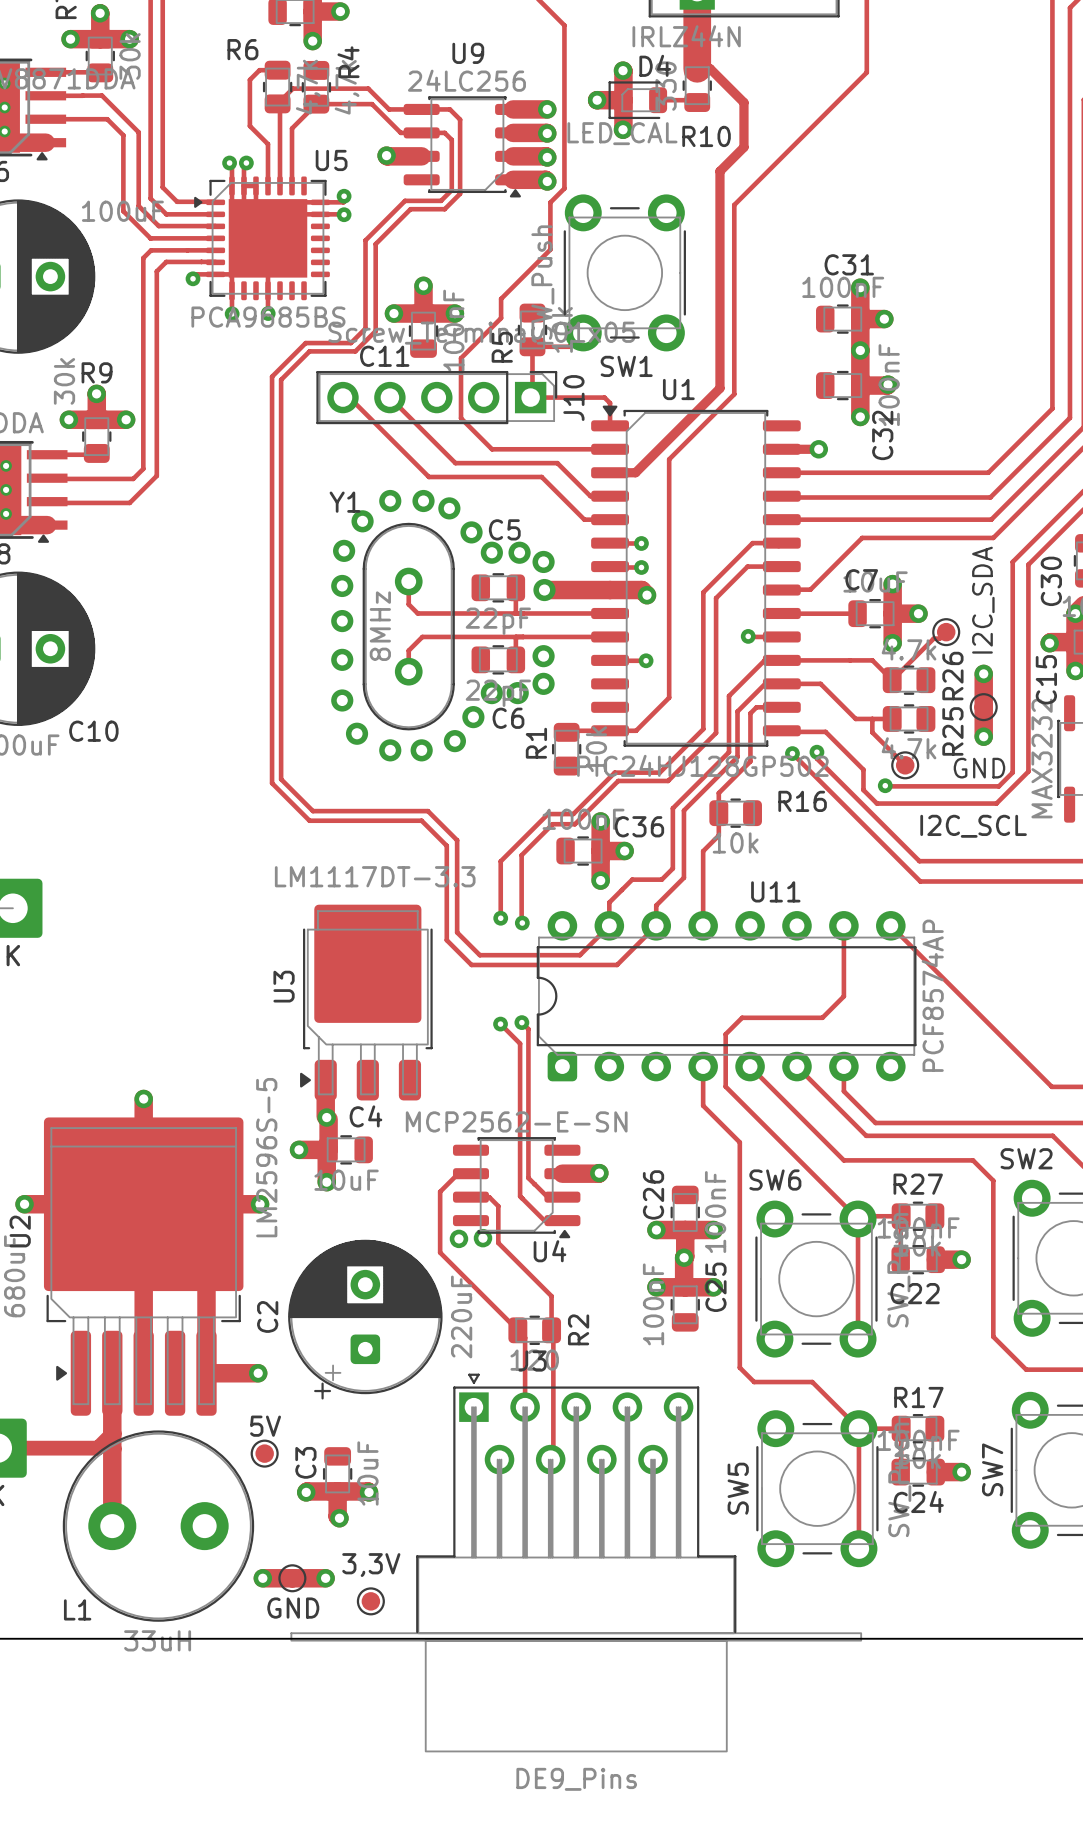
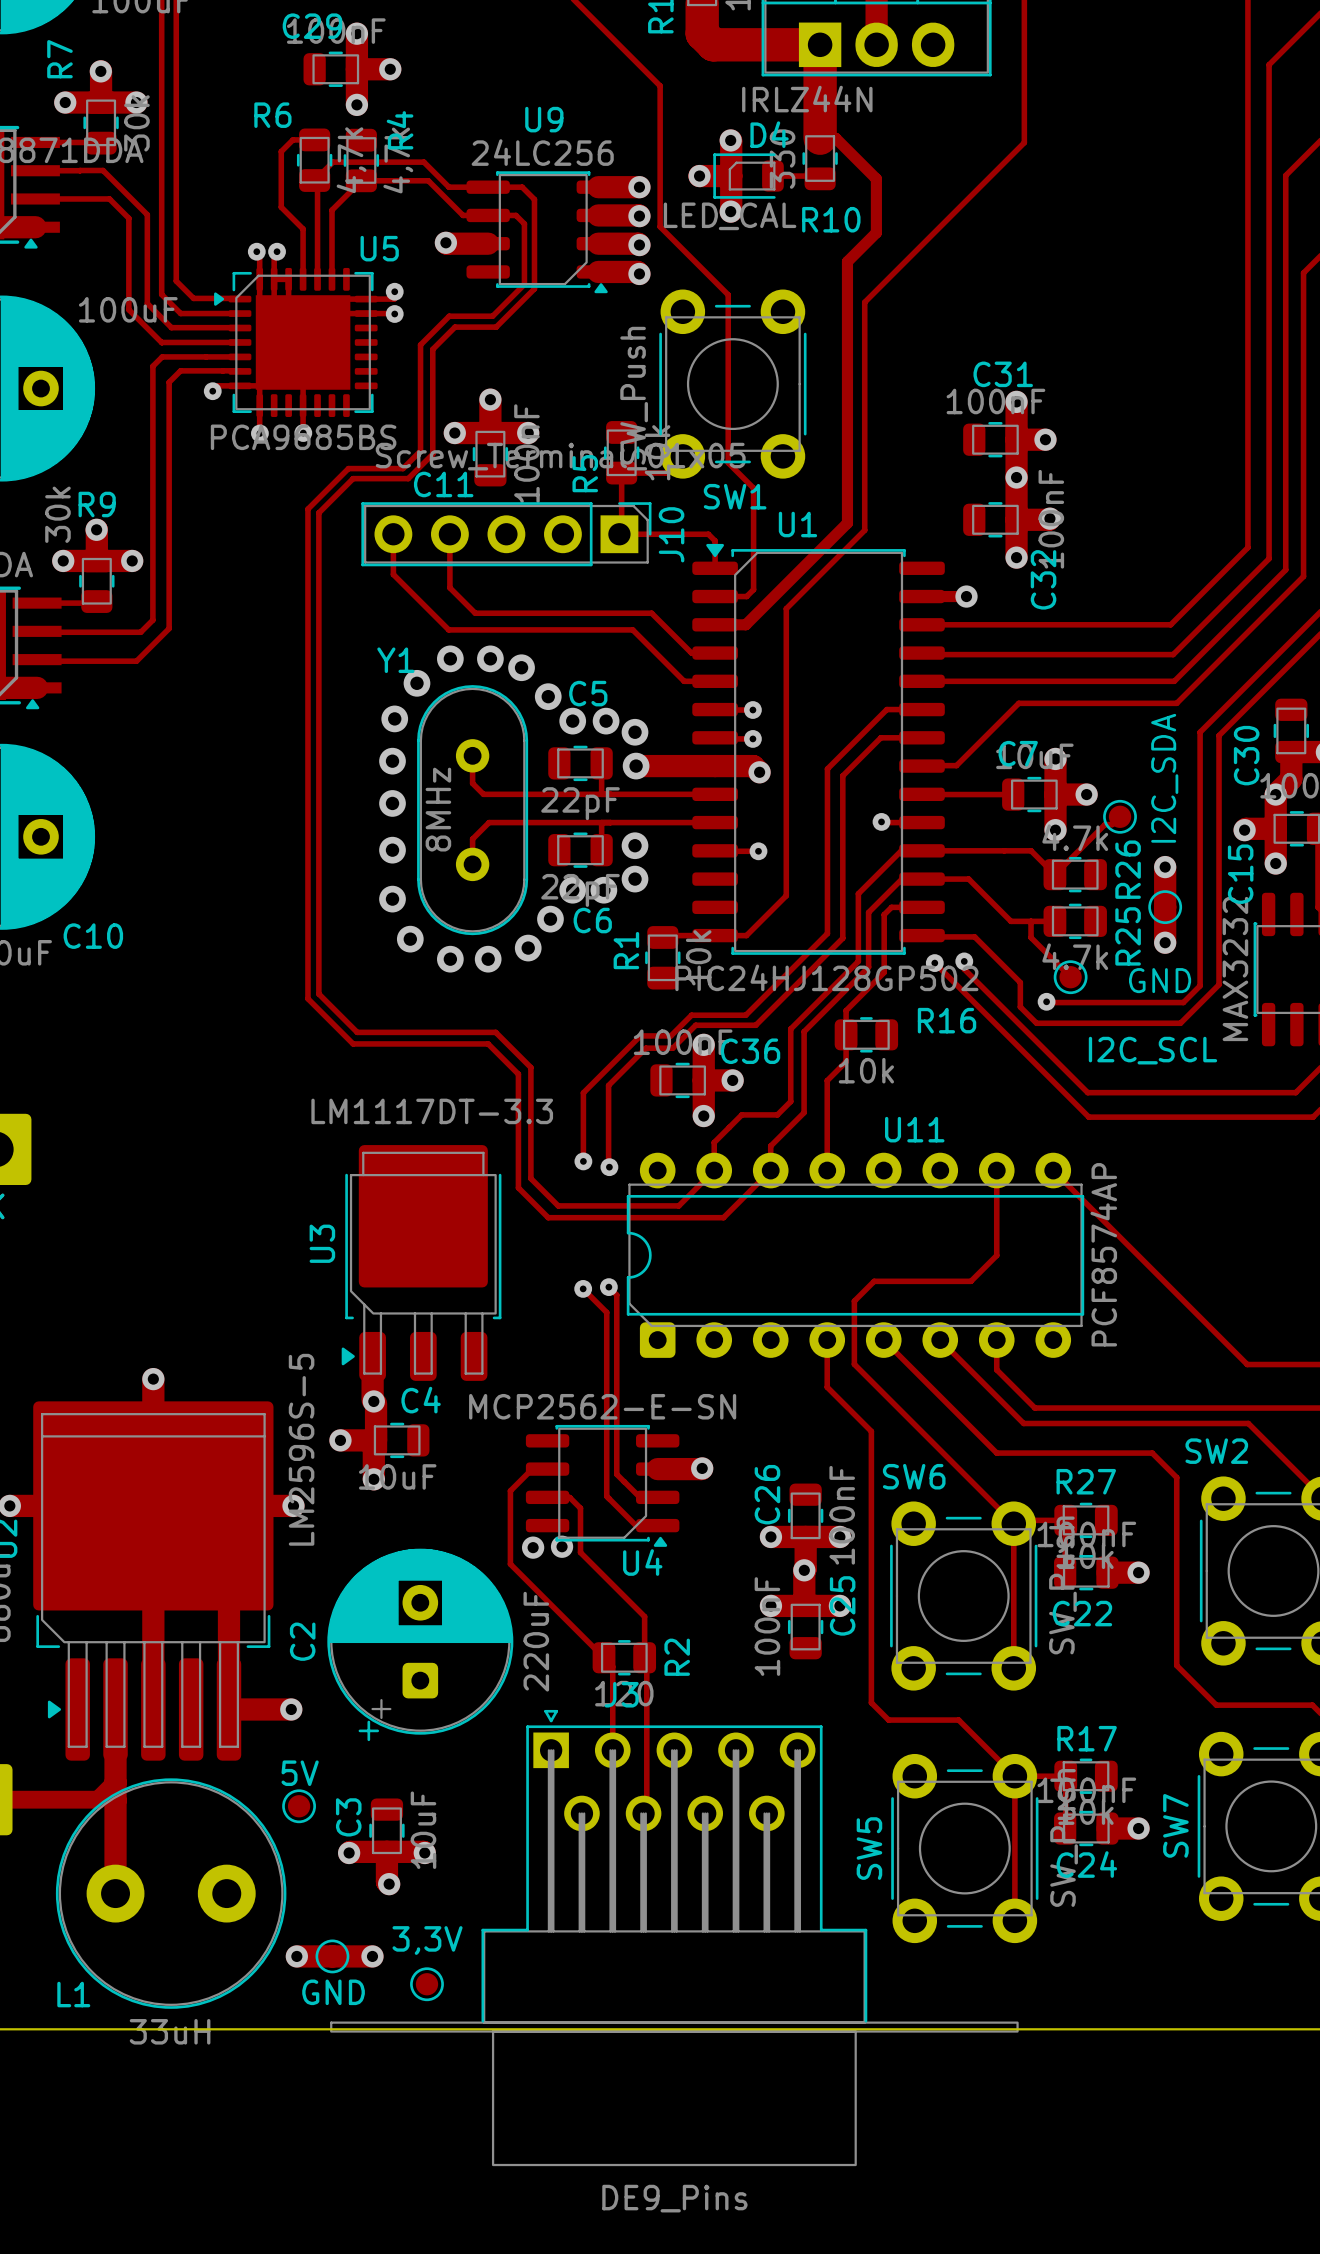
track: (564, 142) (564, 188) (550, 202) (550, 249) (501, 298) (501, 318) (461, 358) (461, 418) (492, 449) (610, 449) -> (660, 226) (728, 294) (728, 462) (753, 488) (753, 589) (746, 596) (715, 596)
track: (441, 200) (405, 200) (389, 216) -> (511, 297) (492, 316) (449, 316)
track: (444, 209) (410, 209) (394, 225) -> (515, 307) (496, 327) (455, 327)
track: (342, 397) (349, 397) (428, 476) -> (393, 534) (393, 574) (448, 629) (496, 629)
track: (389, 397) (455, 463) -> (449, 534) (449, 587) (475, 613) (528, 613)
track: (659, 772) (614, 772) (590, 796) -> (775, 986) (745, 1015) (691, 1015)
track: (668, 780) (618, 780) (593, 805) -> (785, 996) (755, 1025) (695, 1025)

